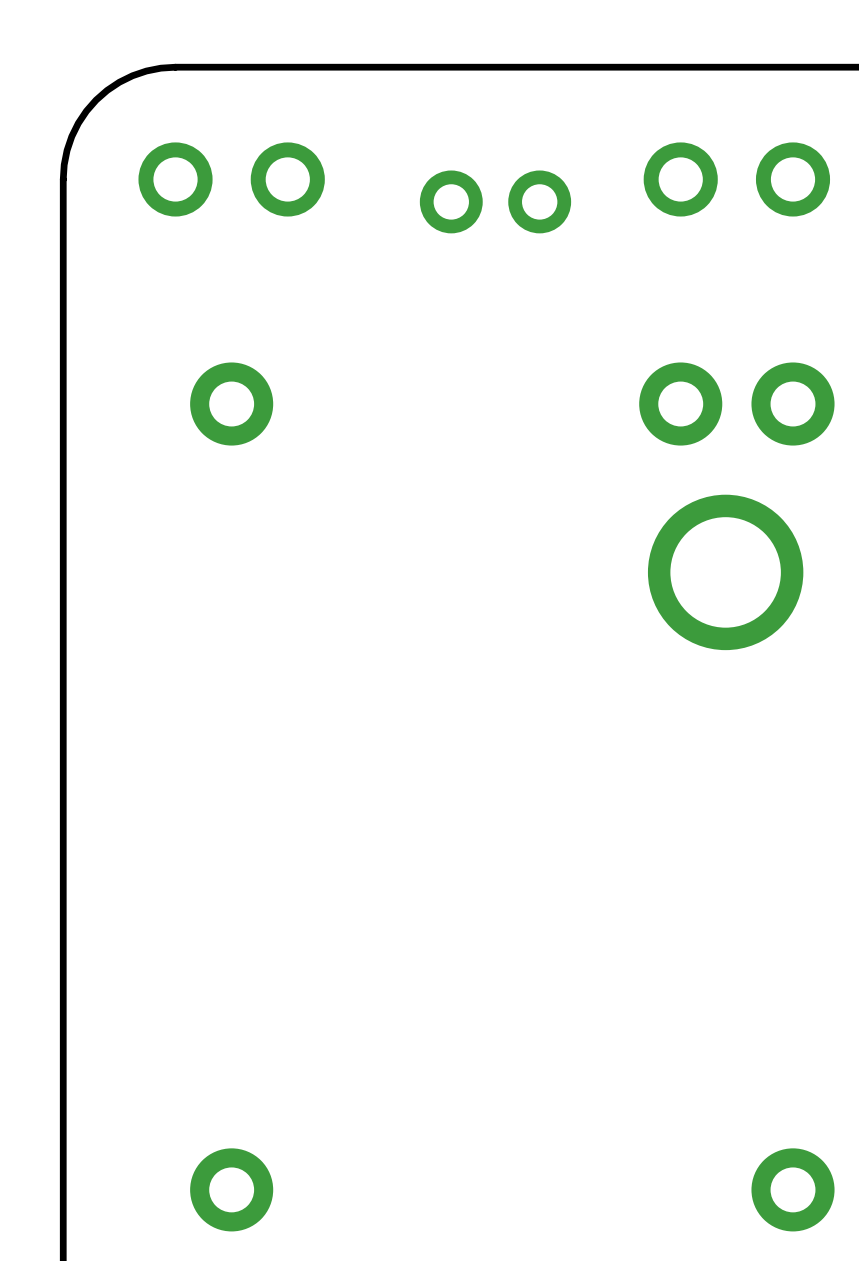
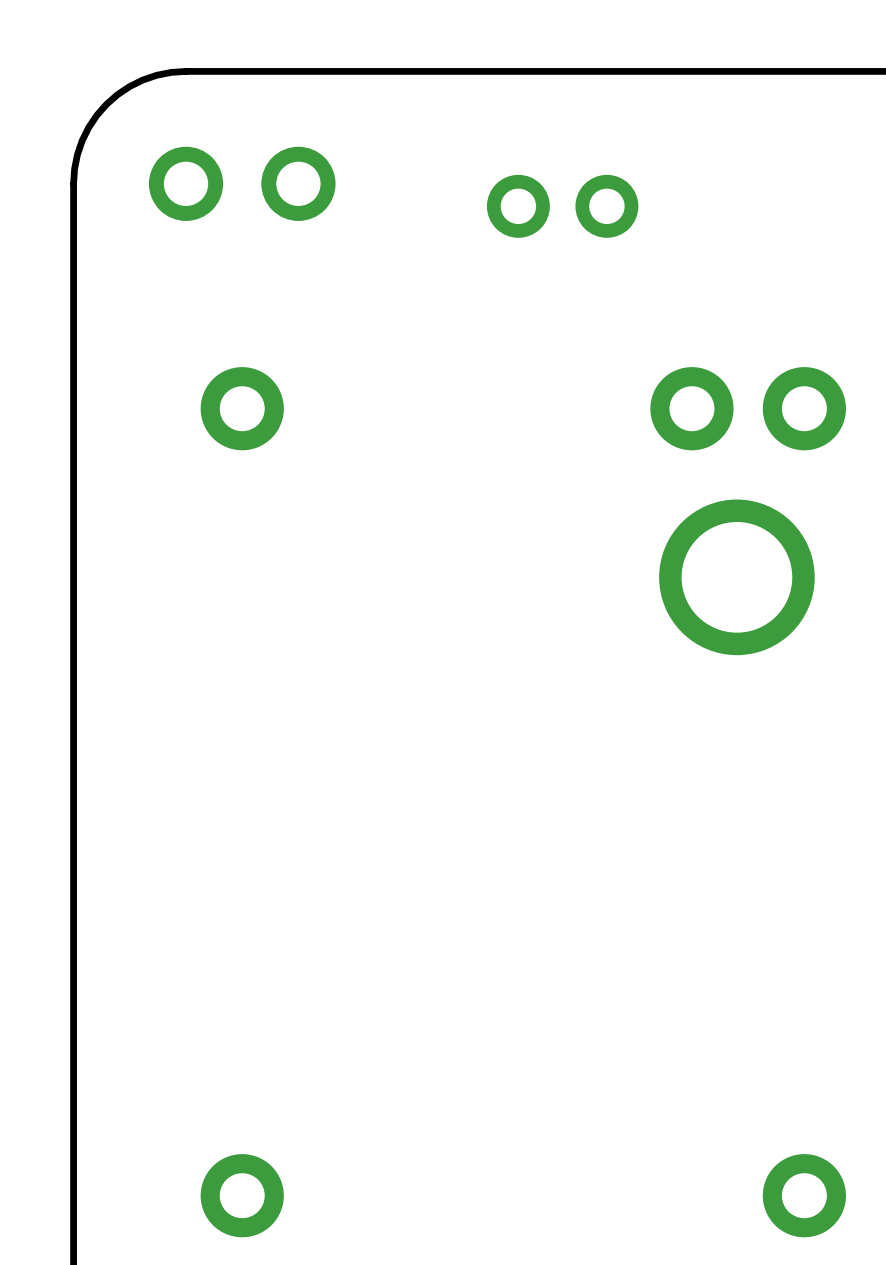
part: (736, 179) -> none
part position: (495, 201) -> (562, 206)

